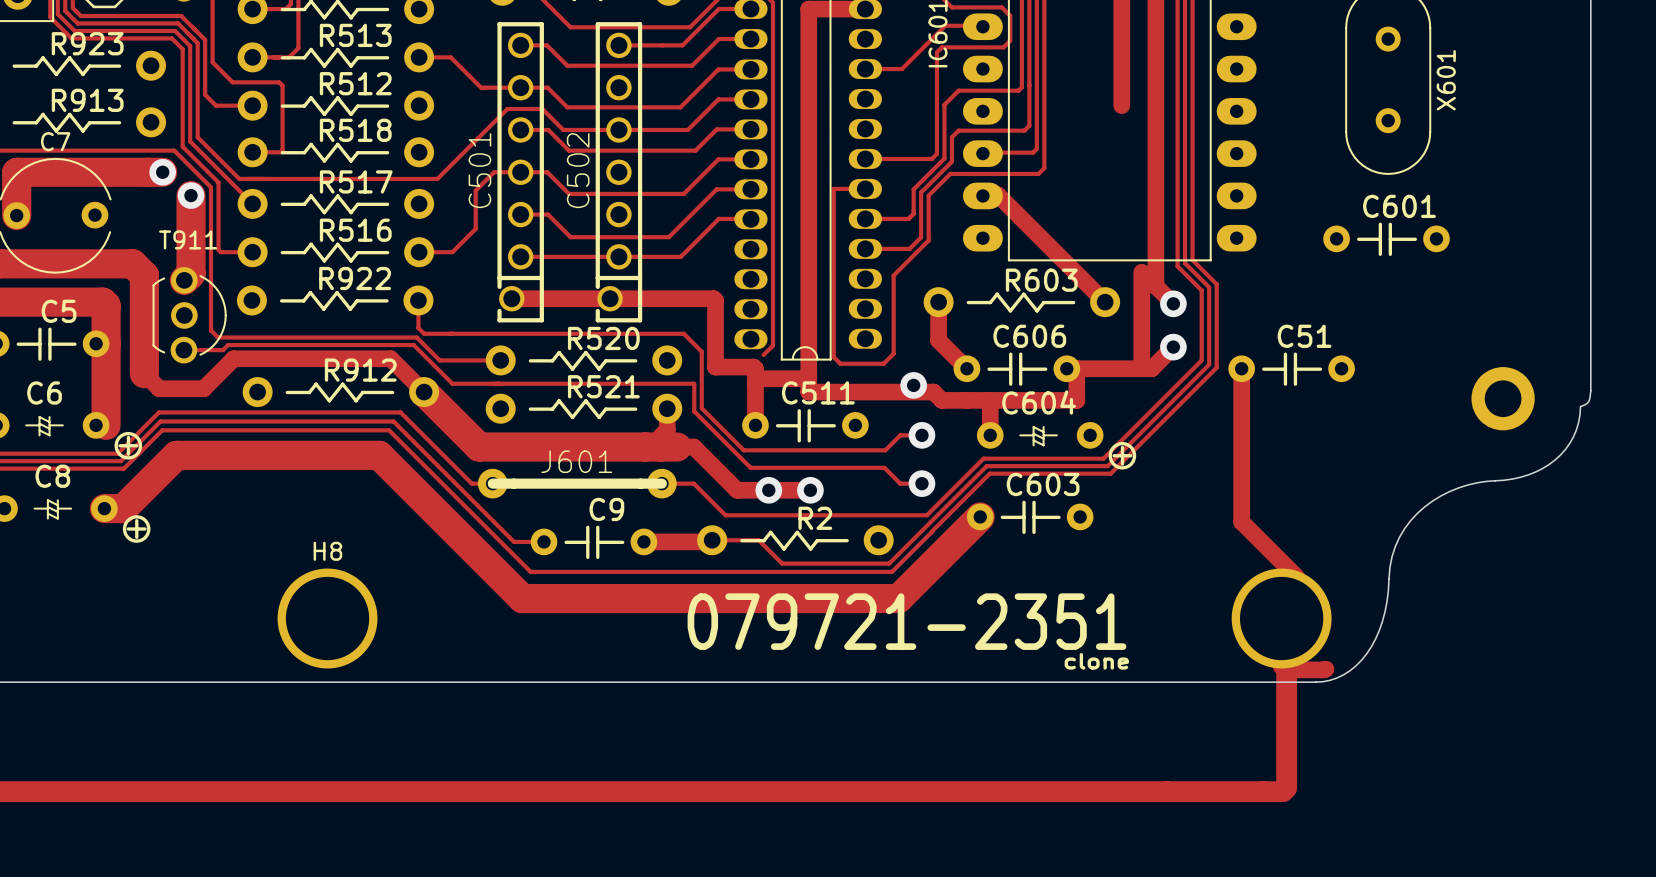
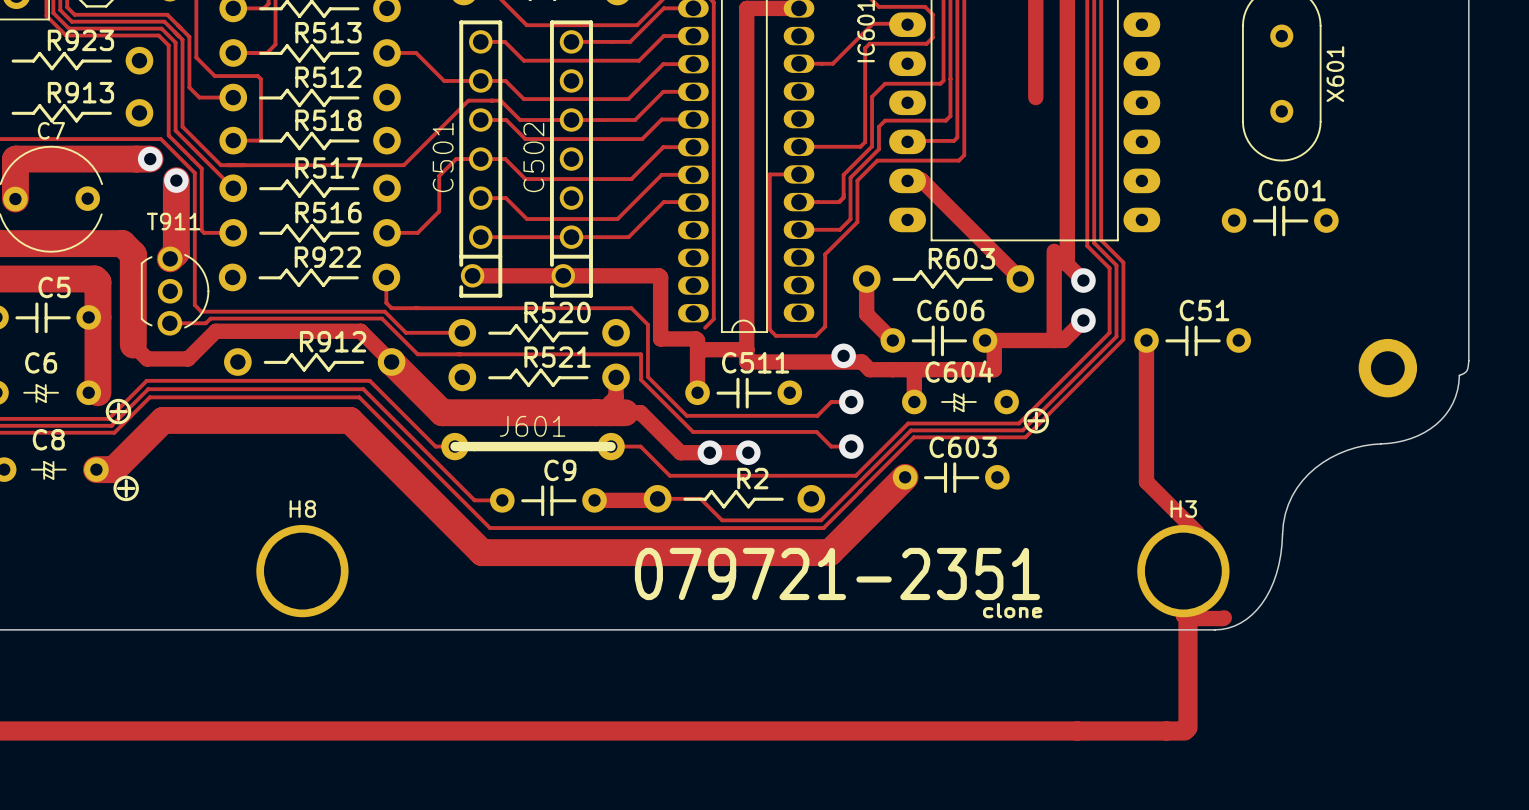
H3 name: none -> H3 (1183, 509)

